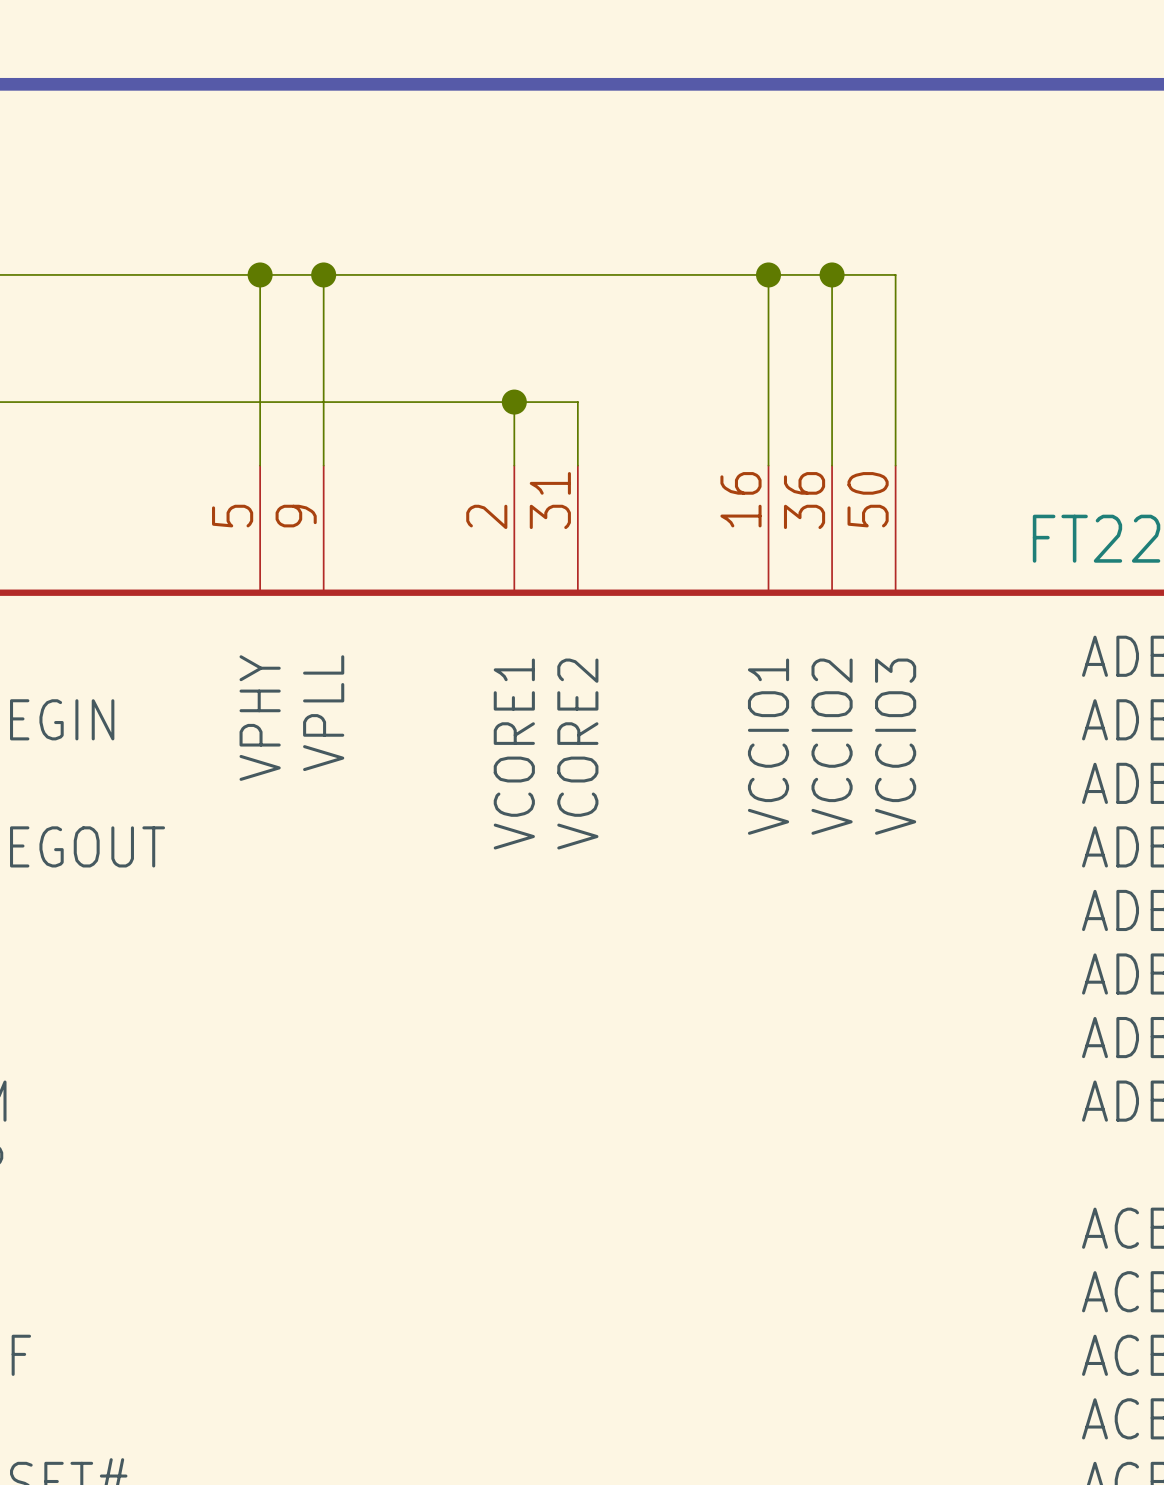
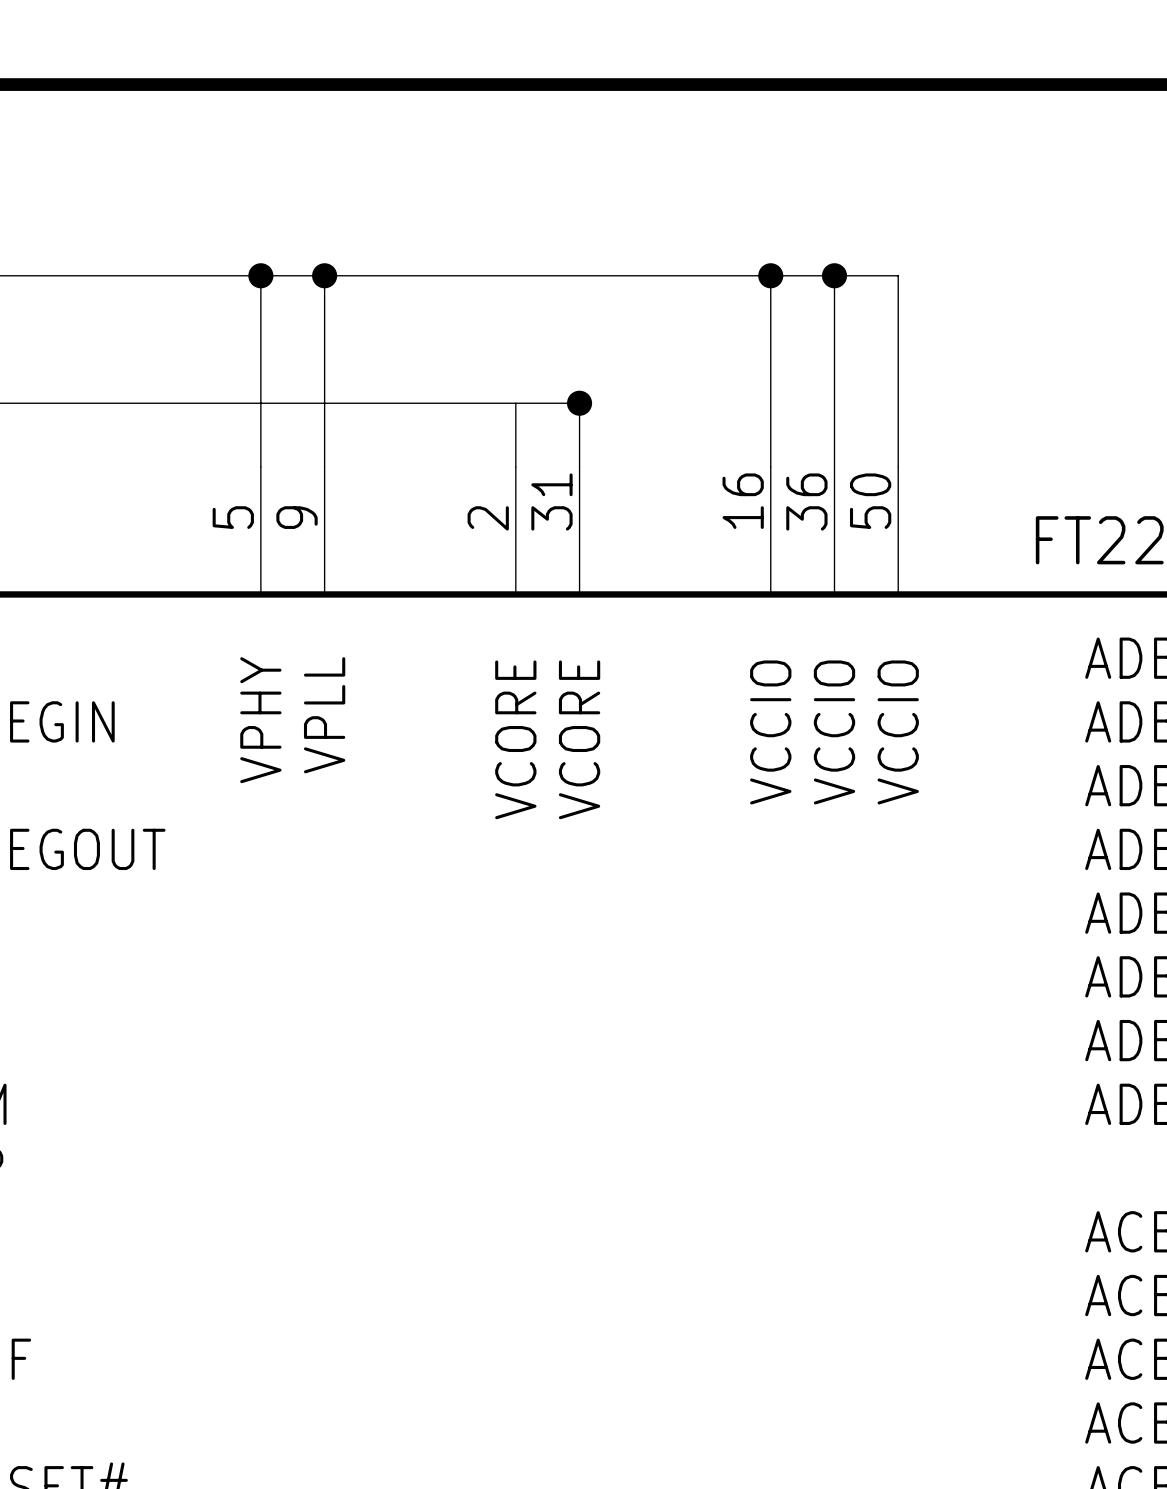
junction position: (514, 402) -> (579, 403)
part pin name: VCCIO1 (768, 746) -> VCCIO (770, 732)
part pin name: VCCIO2 (832, 746) -> VCCIO (834, 732)
part pin name: VCCIO3 (895, 746) -> VCCIO (898, 732)
part pin name: VCORE1 (514, 754) -> VCORE (515, 739)
part pin name: VCORE2 (577, 754) -> VCORE (579, 739)

